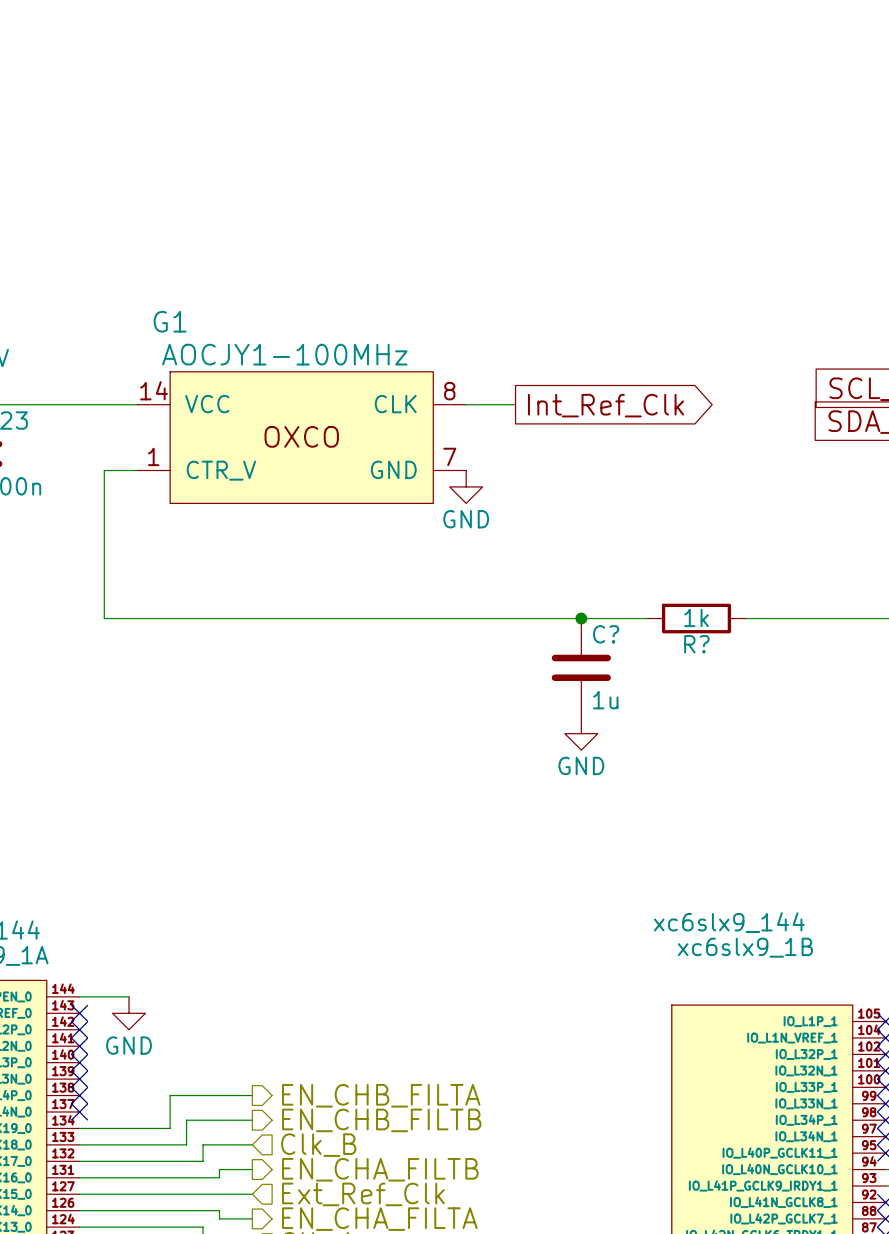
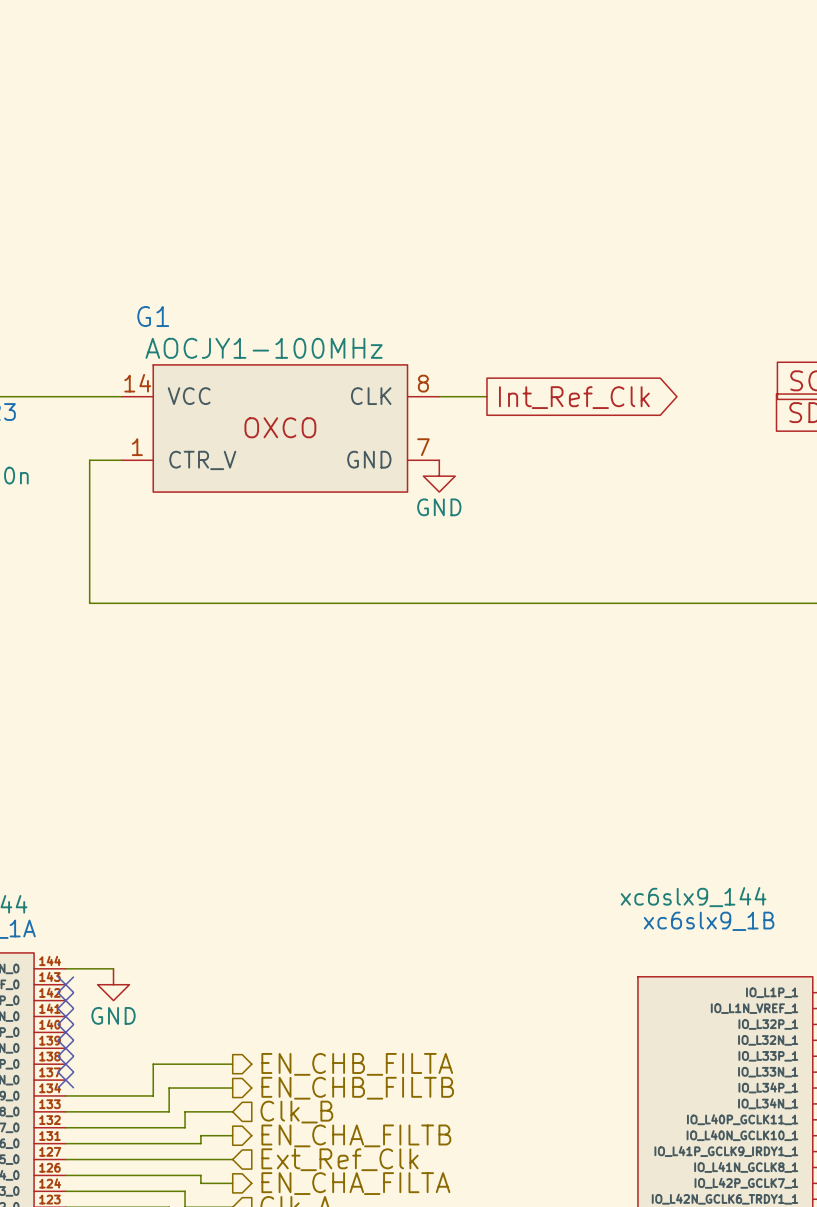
junction: (581, 618) -> none
wire: none -> (614, 603) (709, 603)
R?: 1k (696, 618) -> none
C?: 1u (581, 667) -> none
power symbol: GND (581, 733) -> none

